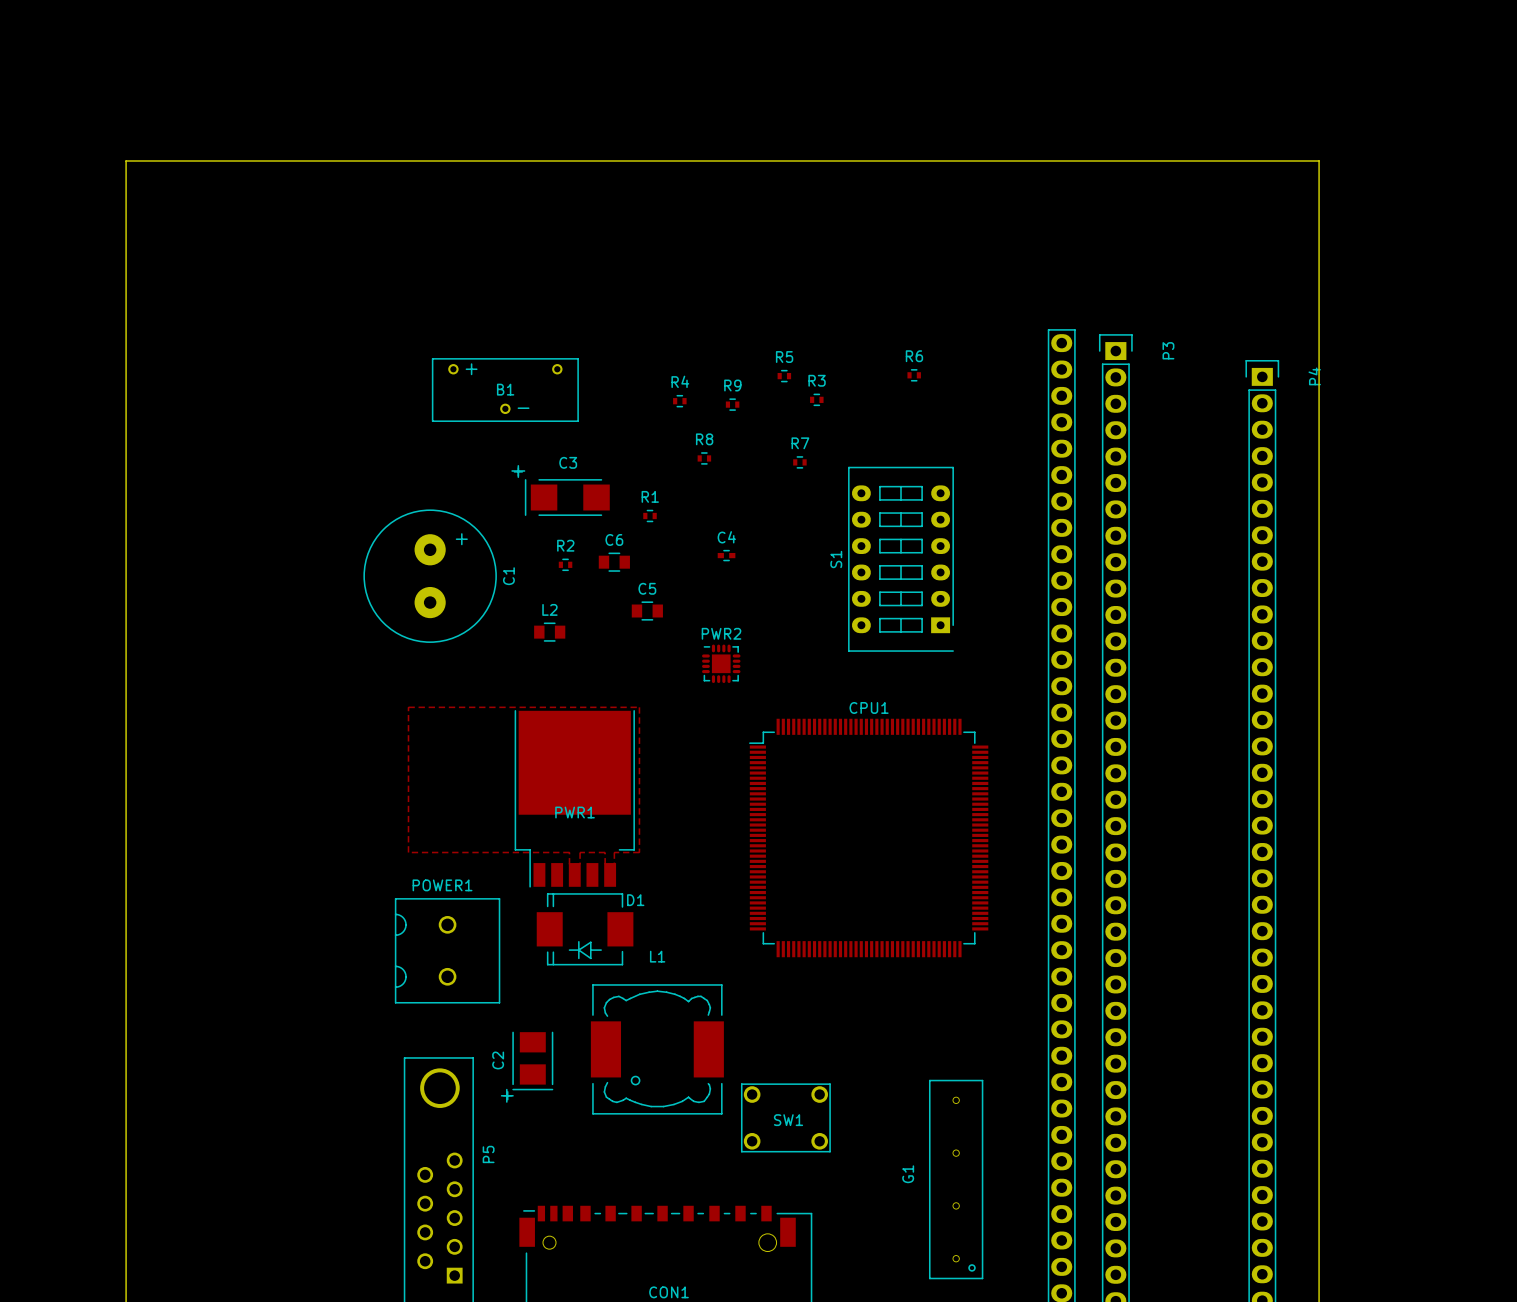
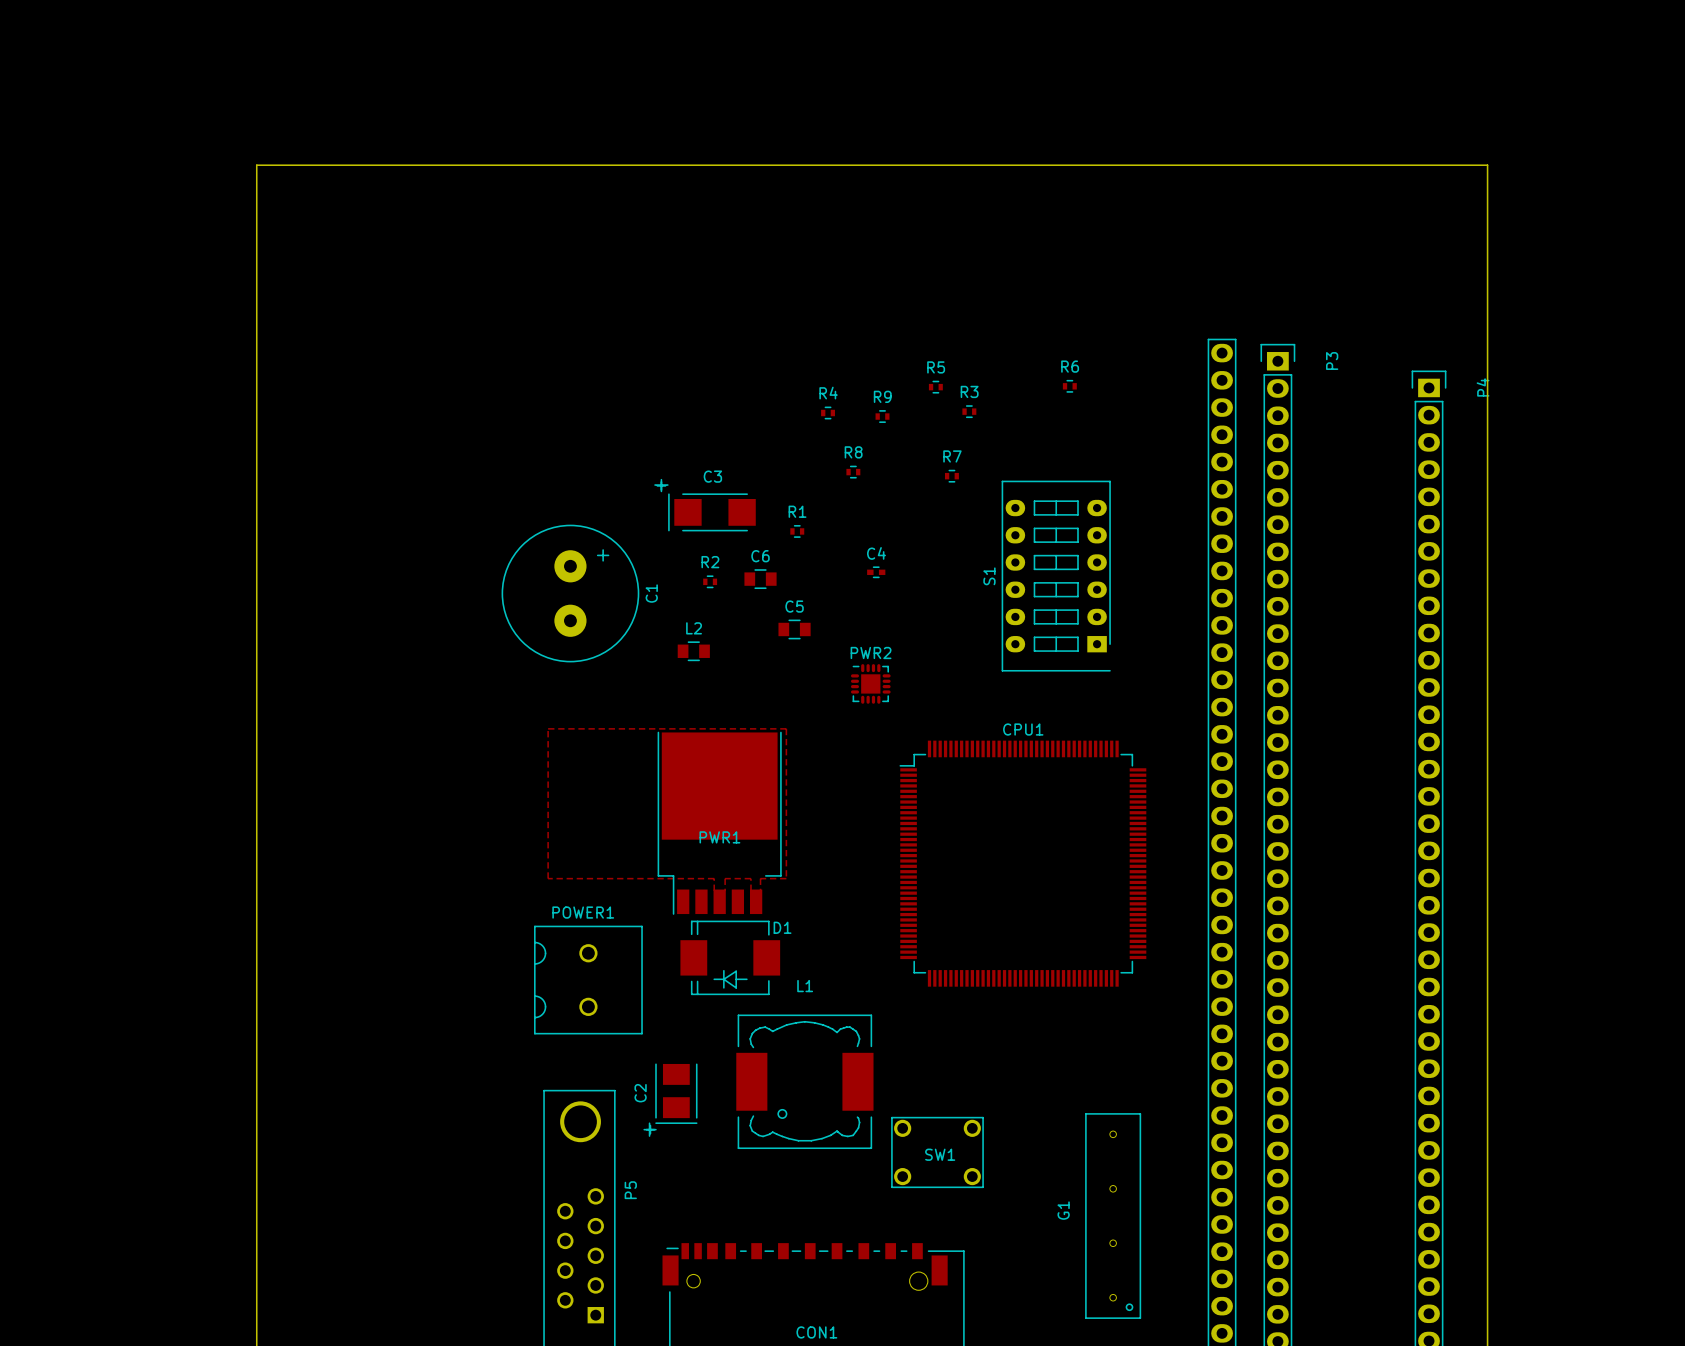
B1: (505, 390) -> none

